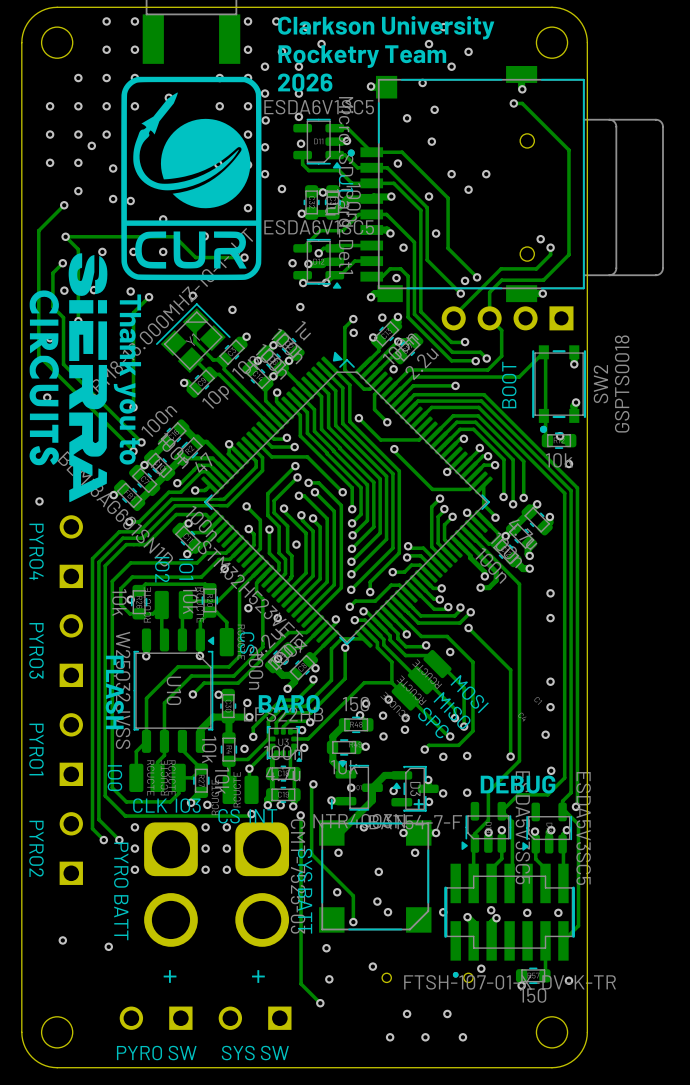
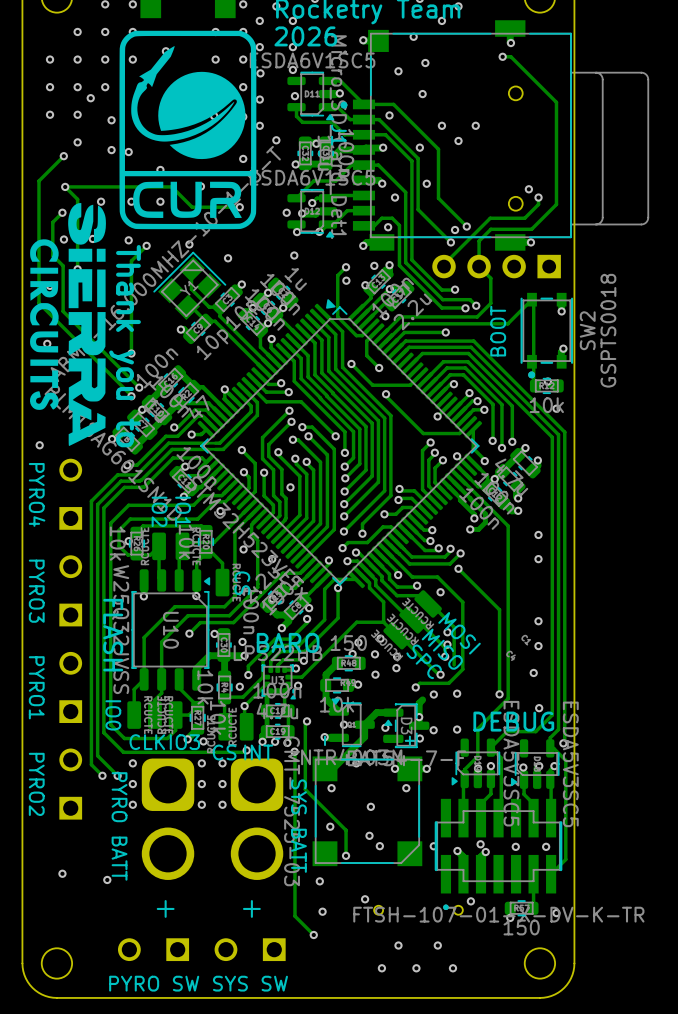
via: none -> (447, 632)
via: none -> (447, 644)
via: (464, 726) -> none
track: none -> (422, 699) (419, 703) (419, 717)

